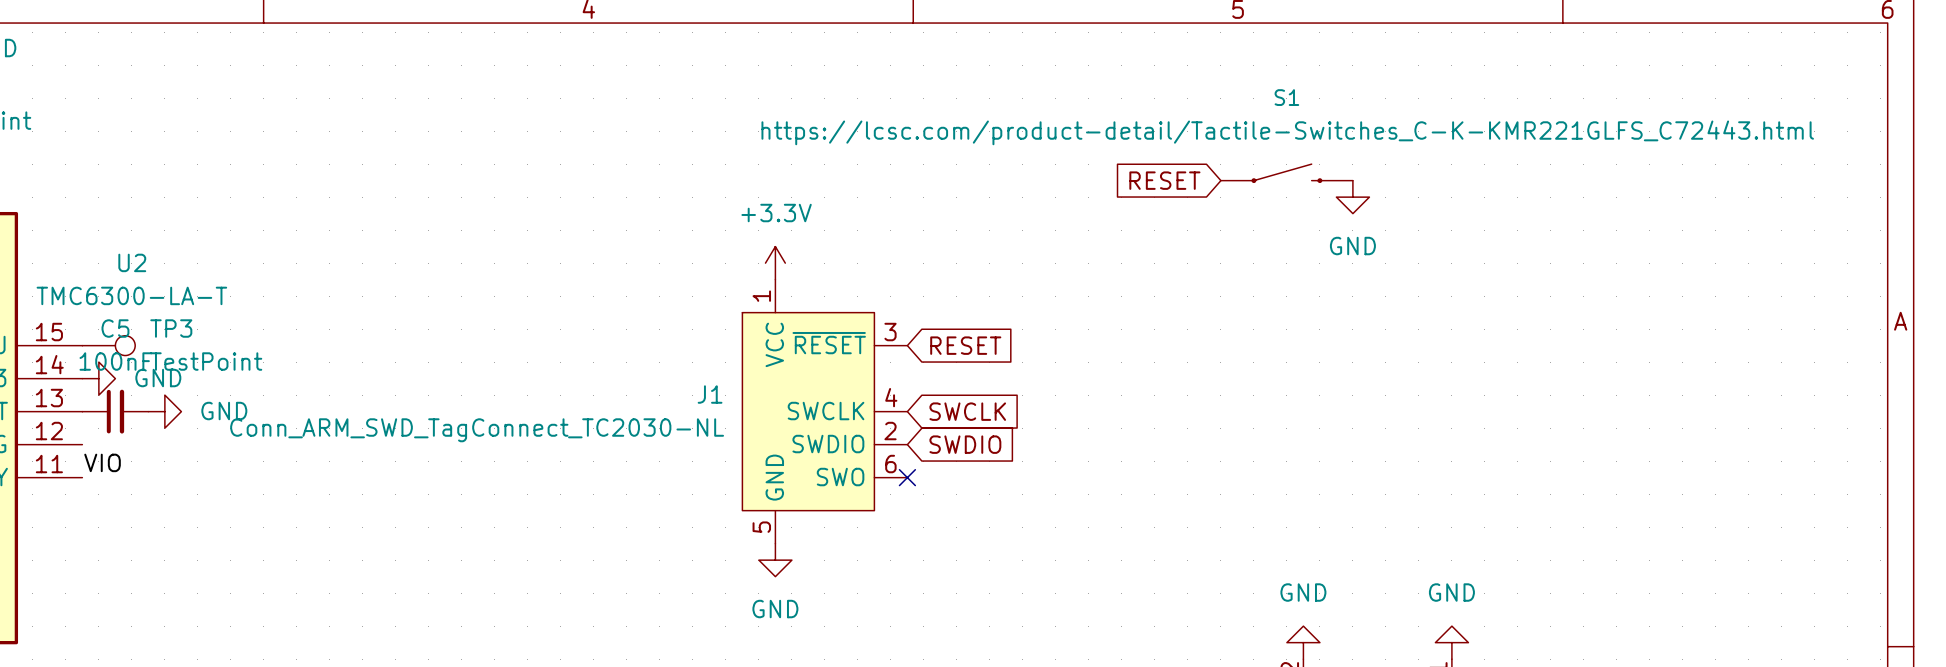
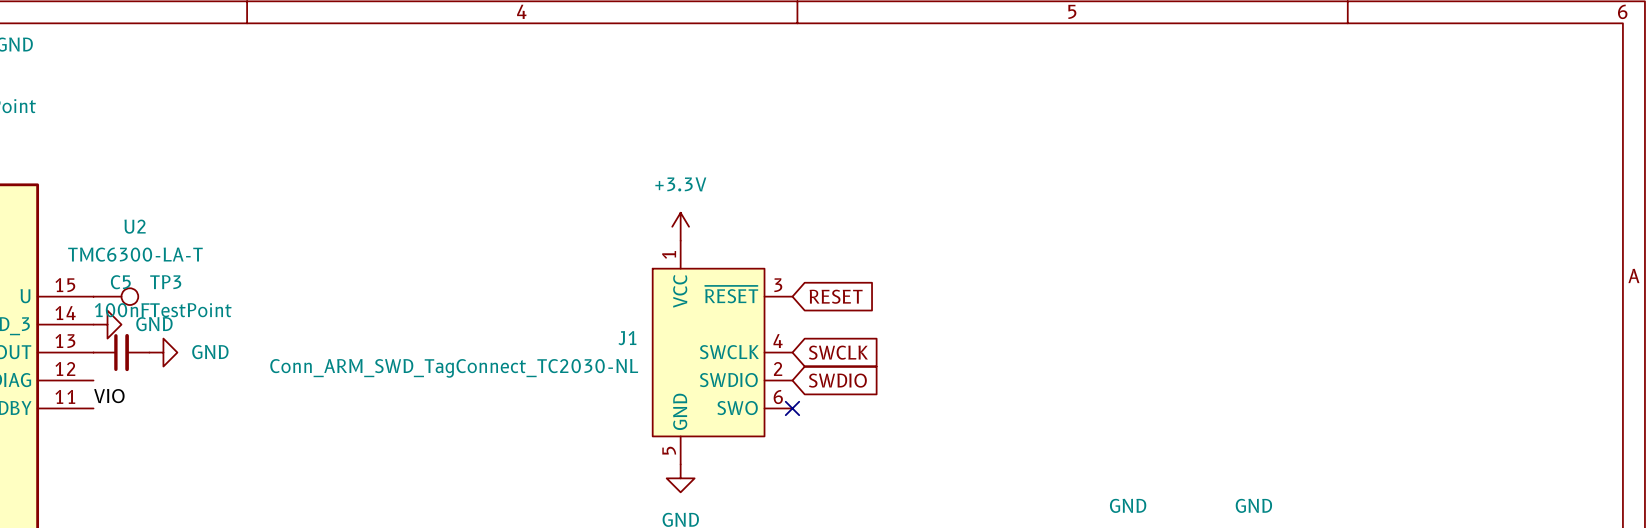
S1: (1286, 173) -> none
global label: RESET (1164, 180) -> none
power symbol: GND (1352, 197) -> none

